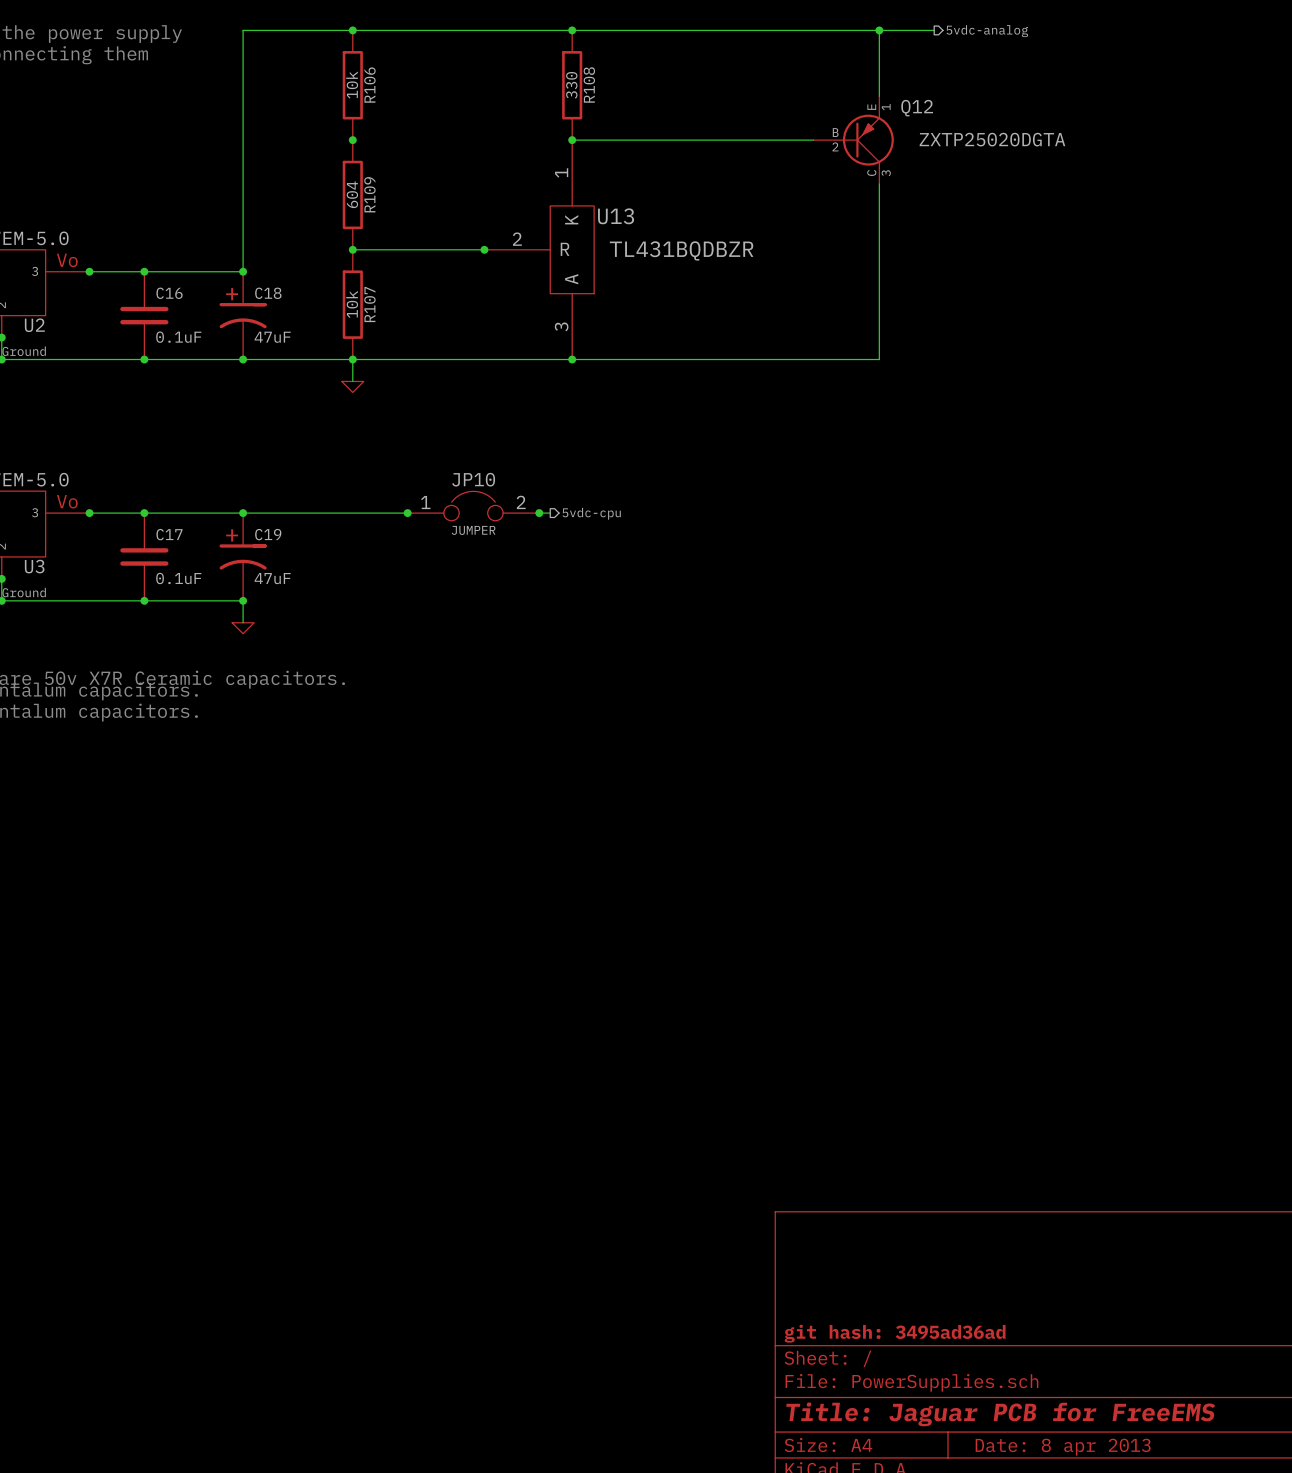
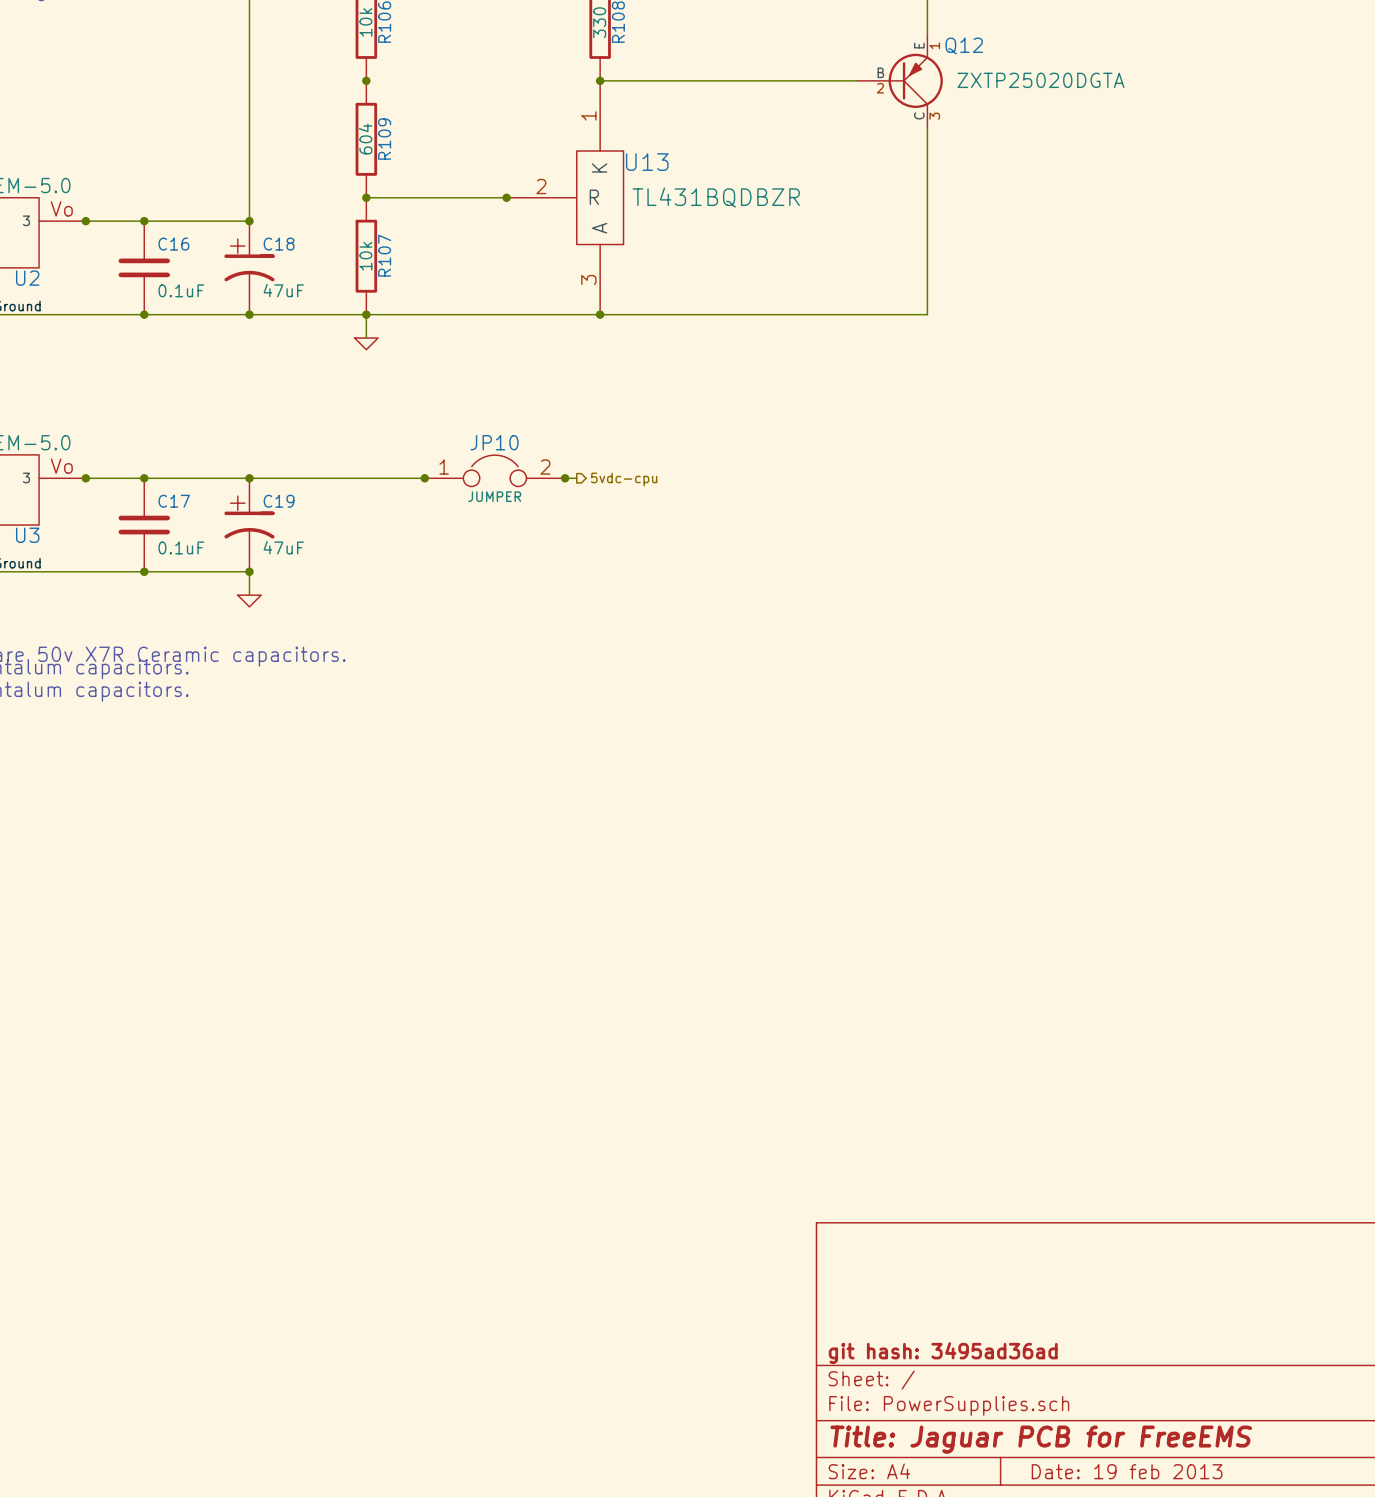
title block: Date: 8 apr 2013 (1063, 1447) -> Date: 19 feb 2013 (1127, 1471)

